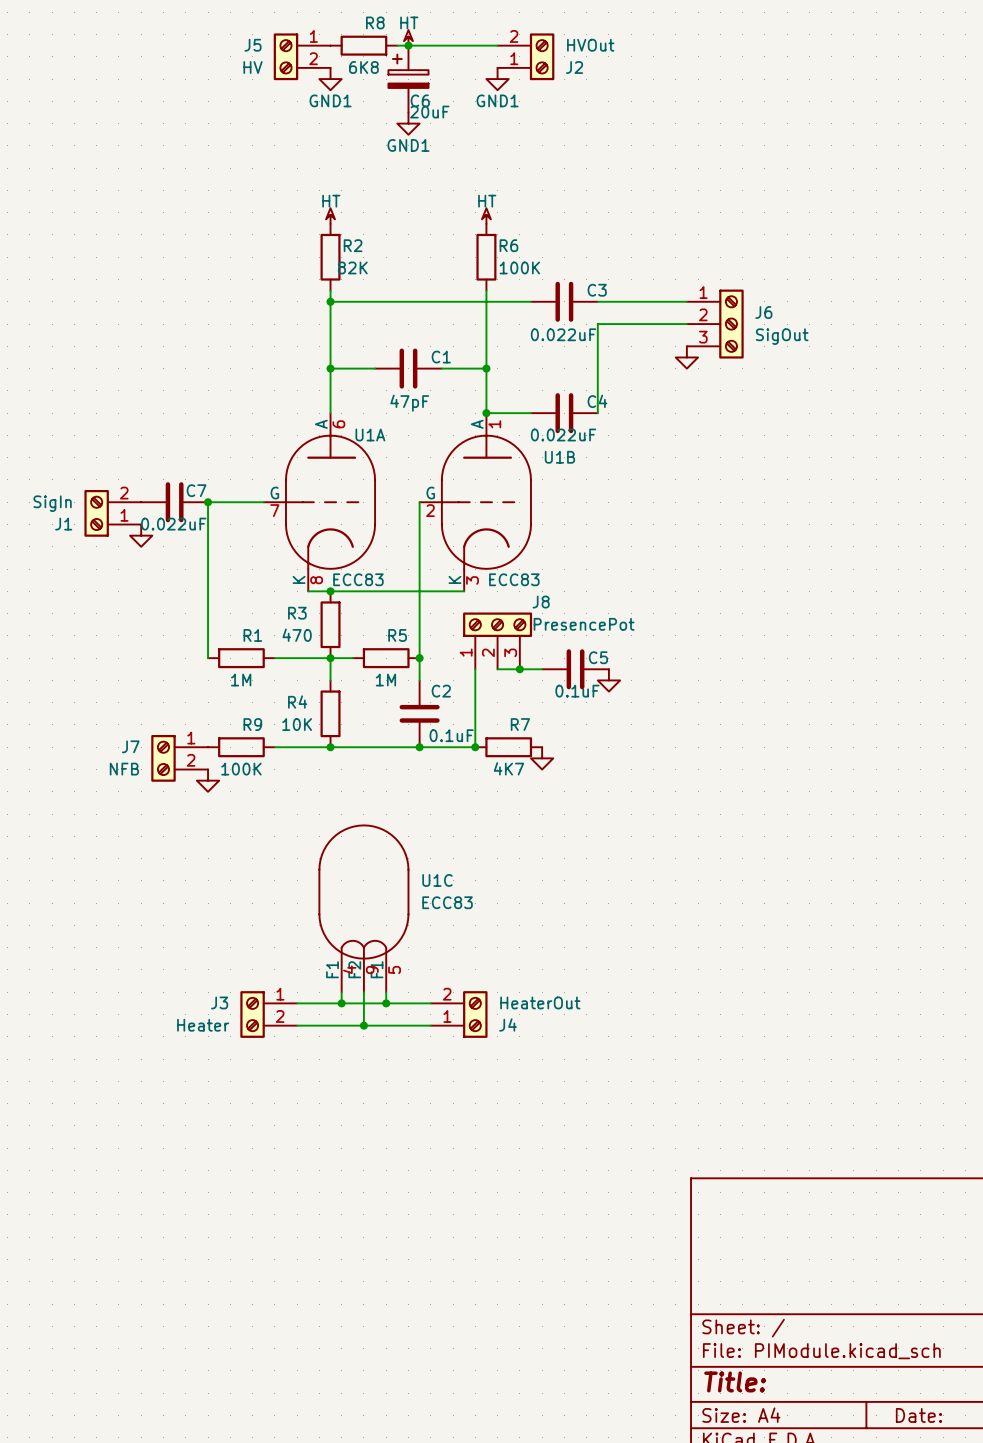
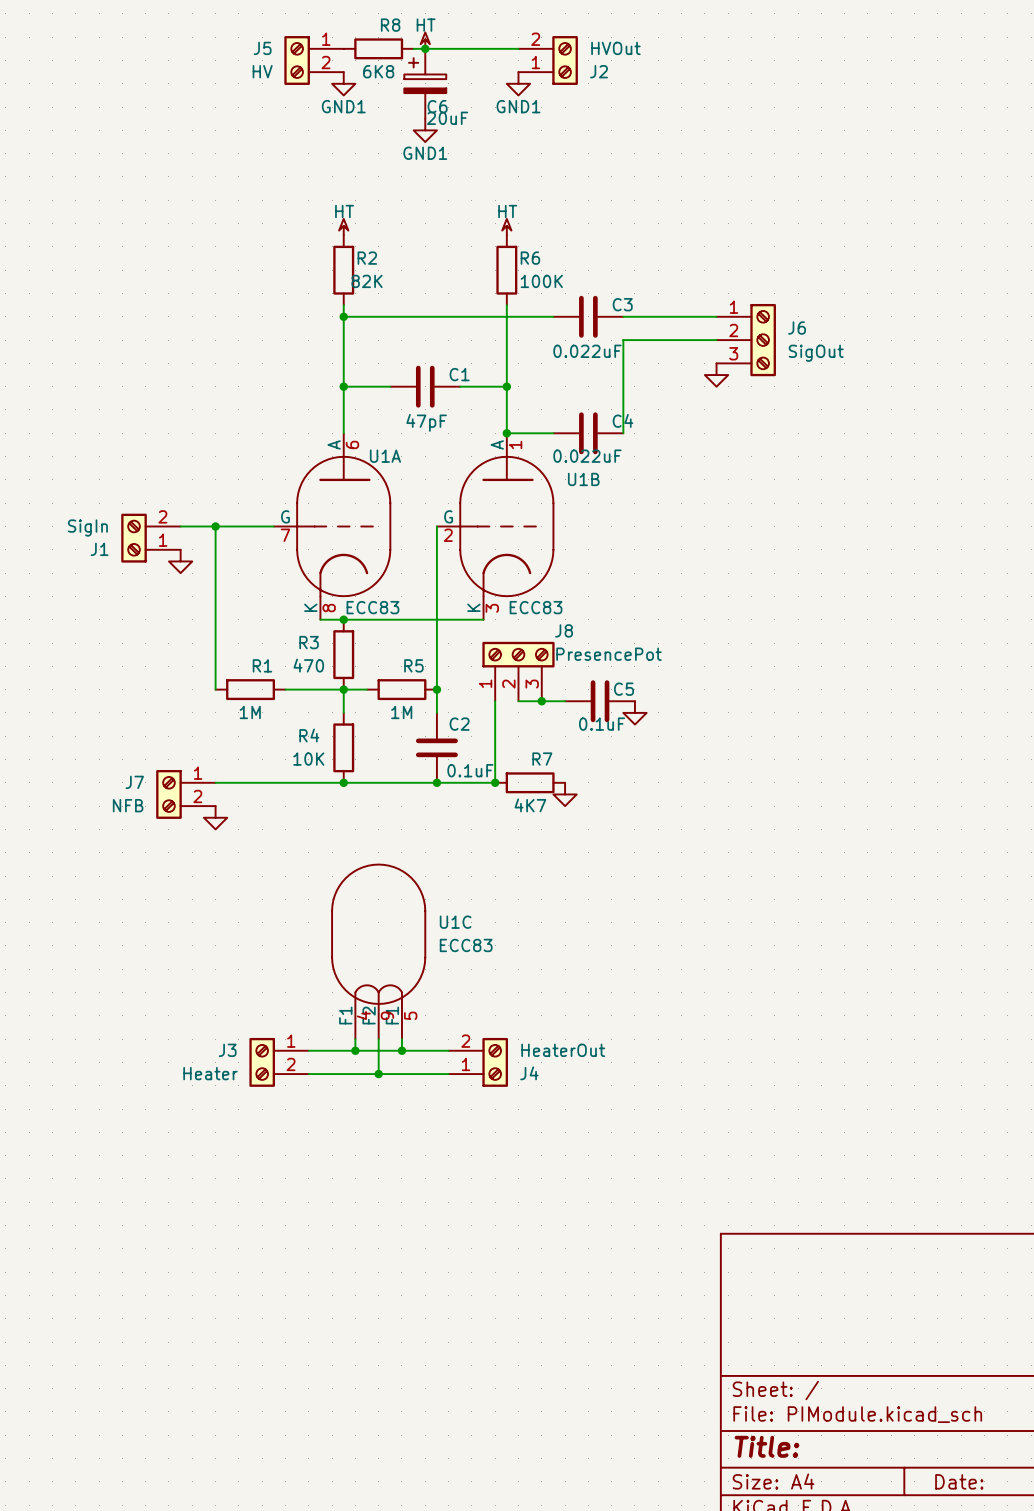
C7: 0.022uF (174, 502) -> none
J1 position: (112, 513) -> (150, 538)
power symbol position: (141, 535) -> (180, 561)
wire: none -> (215, 782) (285, 782)
R9: 100K (241, 747) -> none

